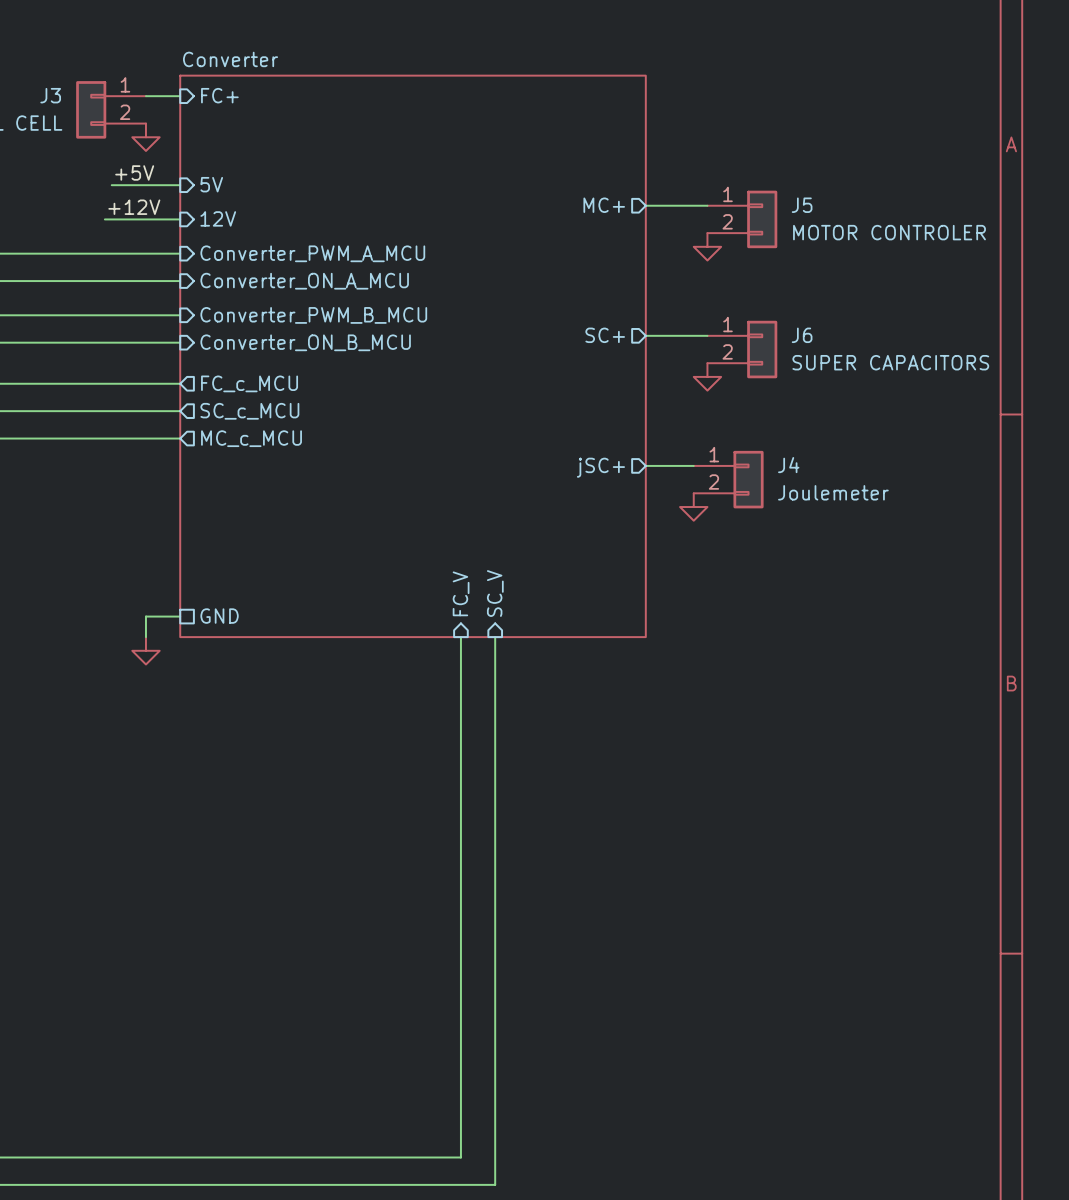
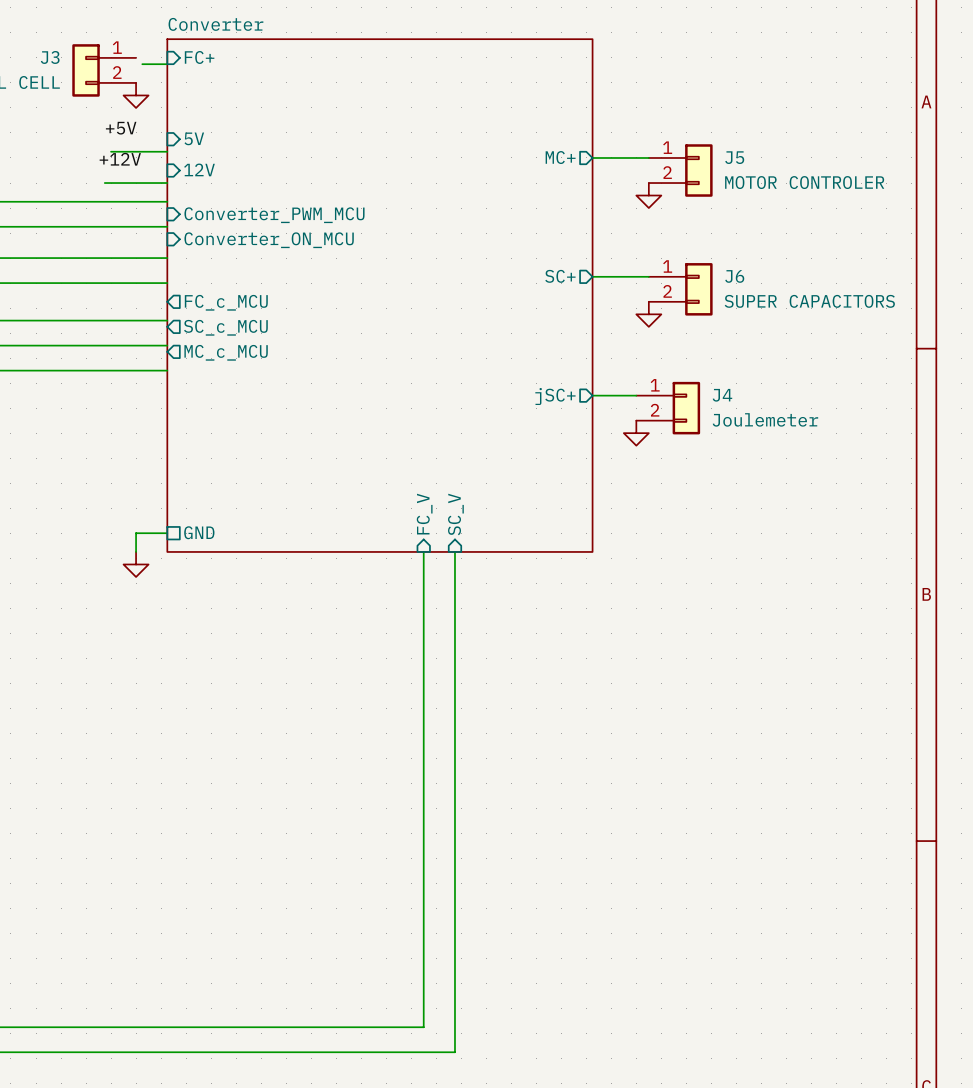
wire: (145, 96) (180, 96) -> none
wire: none -> (142, 64) (167, 64)
wire: (111, 185) (180, 185) -> (104, 183) (167, 183)
wire: none -> (111, 151) (167, 151)
wire: (104, 219) (180, 219) -> none
sheet pin: Converter_PWM_A_MCU (312, 253) -> none
sheet pin: none -> Converter_PWM_MCU (274, 215)
sheet pin: Converter_ON_A_MCU (304, 281) -> none
sheet pin: none -> Converter_ON_MCU (269, 240)
sheet pin: Converter_PWM_B_MCU (313, 315) -> none
sheet pin: Converter_ON_B_MCU (305, 342) -> none
sheet pin position: FC_c_MCU (249, 383) -> FC_c_MCU (226, 302)
sheet pin position: SC_c_MCU (249, 411) -> SC_c_MCU (225, 327)
sheet pin position: MC_c_MCU (251, 438) -> MC_c_MCU (226, 352)

